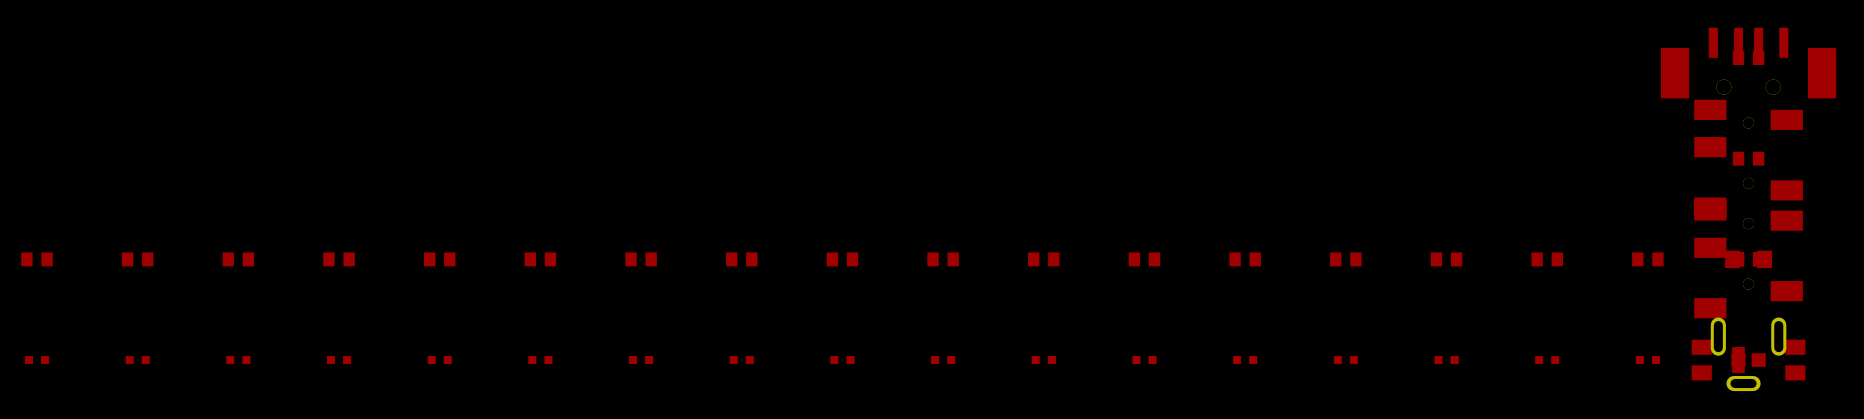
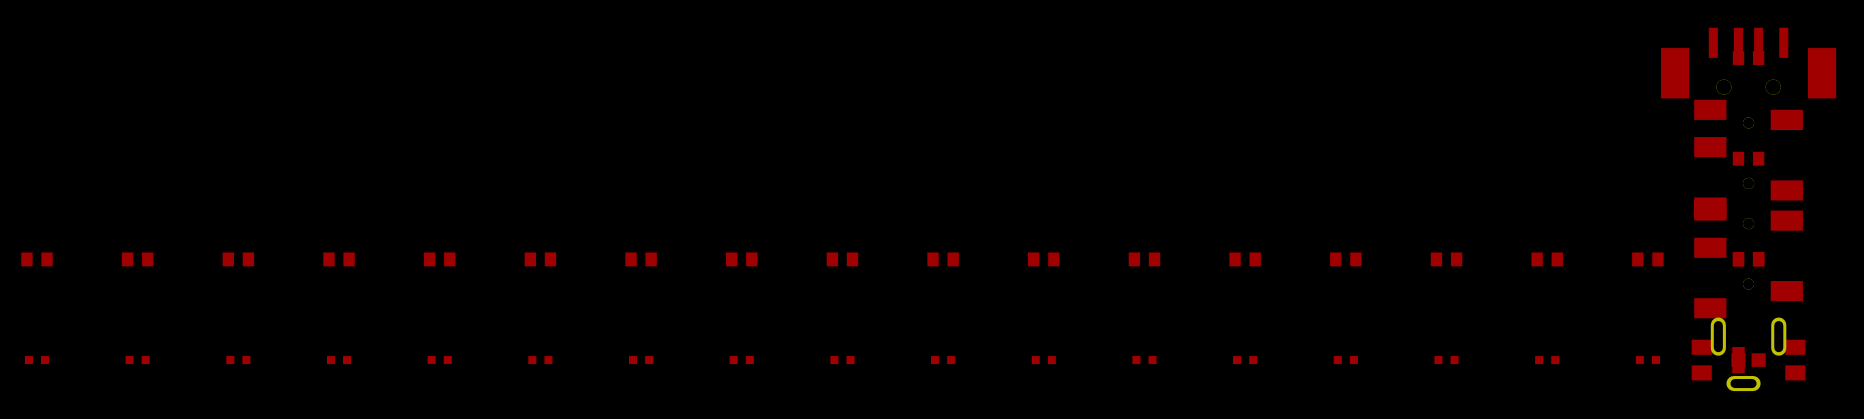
part: (1748, 259) -> none

